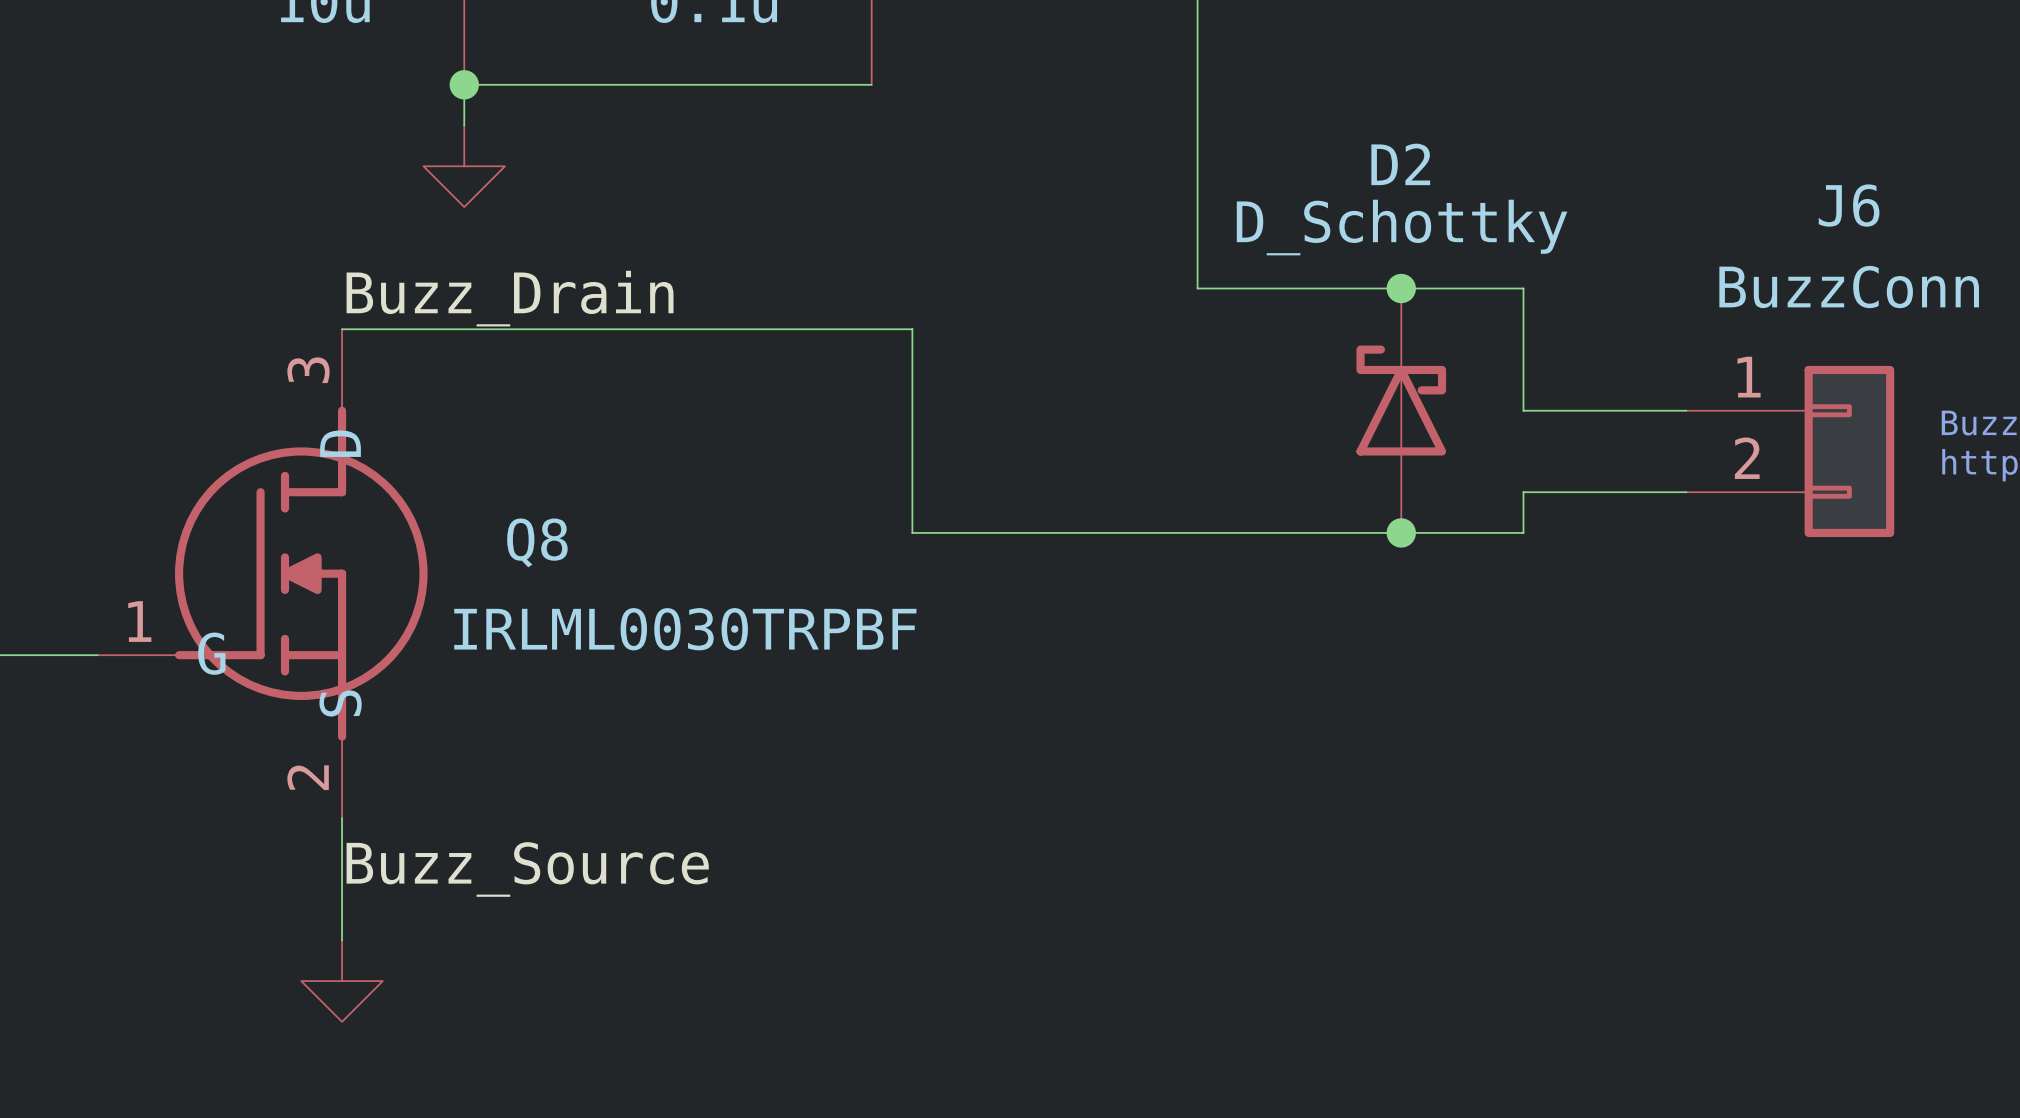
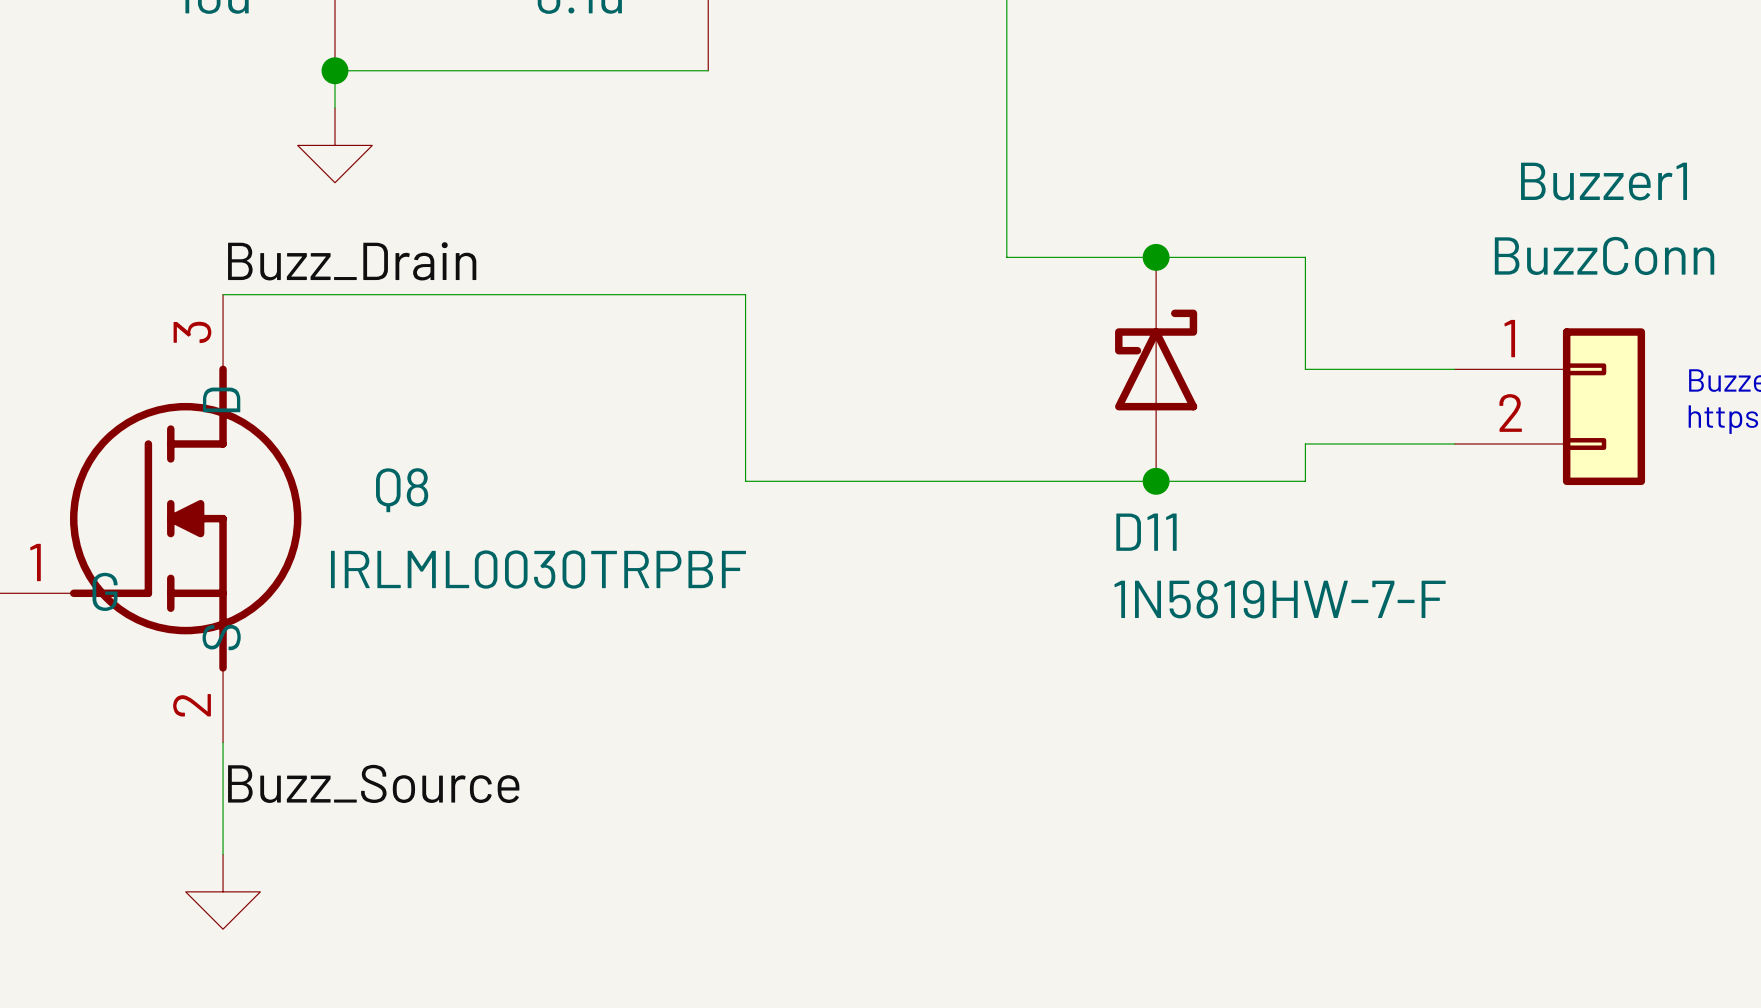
J6 name: J6 (1849, 205) -> Buzzer1 (1604, 181)
junction position: (1401, 288) -> (1156, 257)
D11: none -> 1N5819HW-7-F (1156, 369)
D2: D_Schottky (1401, 410) -> none
junction position: (1401, 532) -> (1156, 481)

